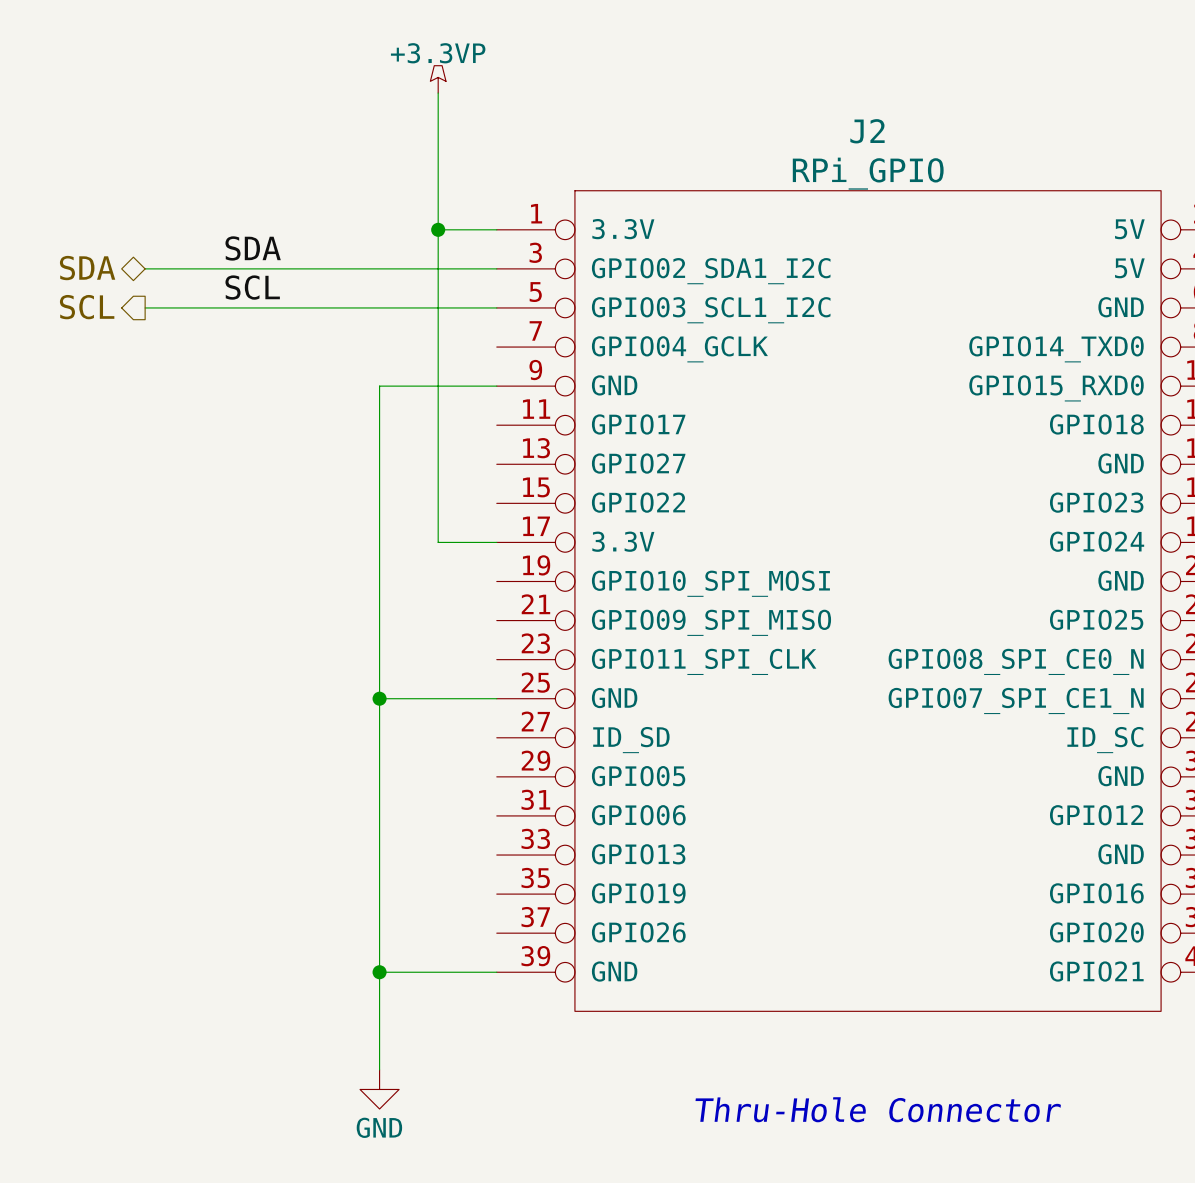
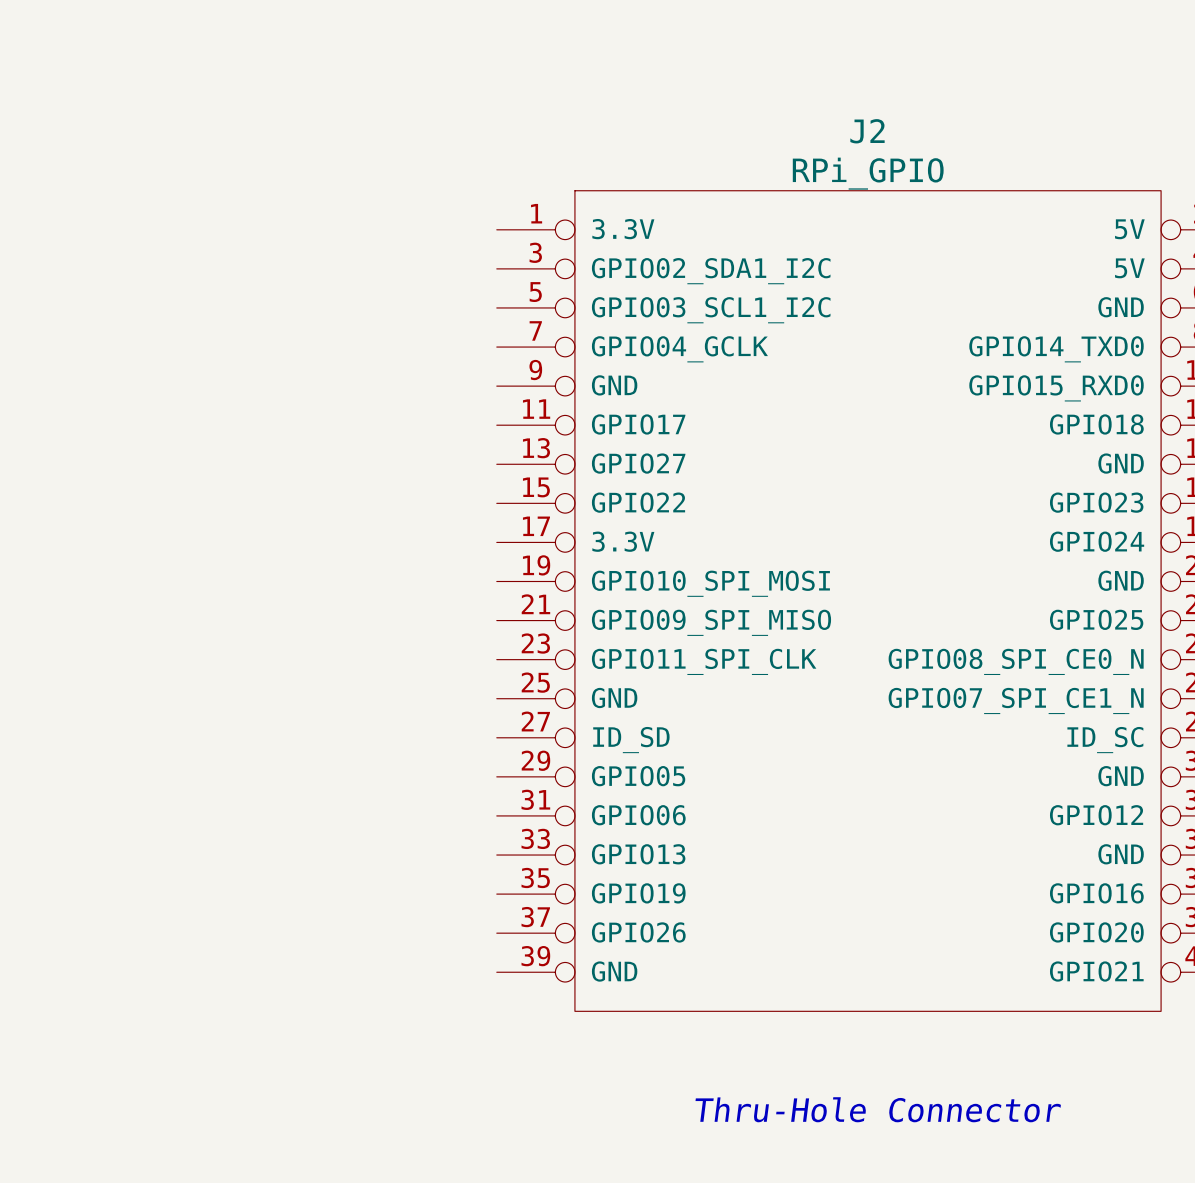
power symbol: +3.3VP (438, 79) -> none
wire: (438, 93) (438, 542) (496, 542) -> none
wire: (438, 229) (496, 229) -> none
junction: (438, 229) -> none
label: SDA (253, 248) -> none
hierarchical label: SDA (87, 268) -> none
wire: (145, 268) (496, 268) -> none
label: SCL (252, 287) -> none
hierarchical label: SCL (87, 307) -> none
wire: (145, 307) (496, 307) -> none
wire: (496, 386) (379, 386) (379, 1069) -> none
wire: (379, 698) (496, 698) -> none
junction: (379, 698) -> none
wire: (379, 972) (496, 972) -> none
junction: (379, 972) -> none
power symbol: GND (379, 1089) -> none

